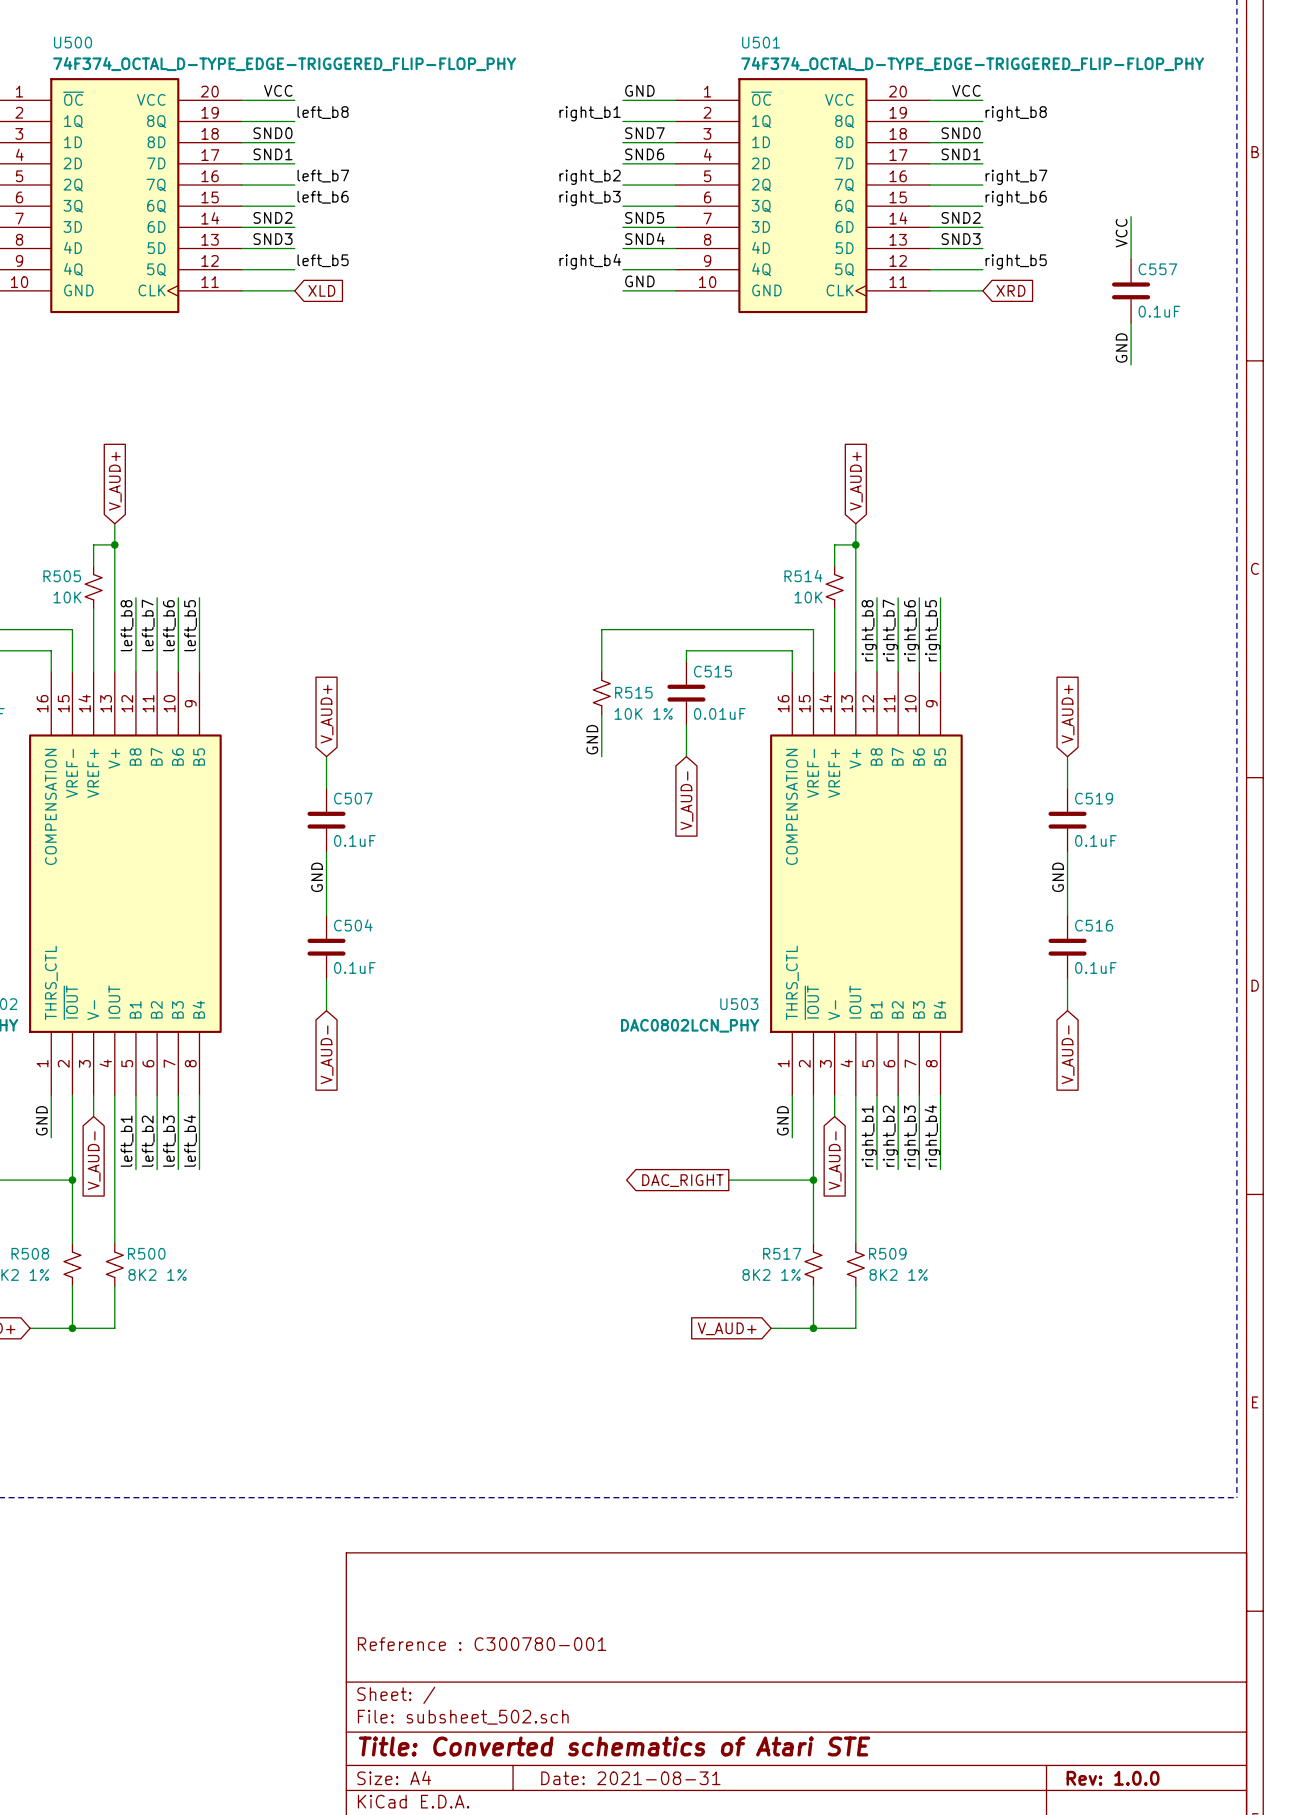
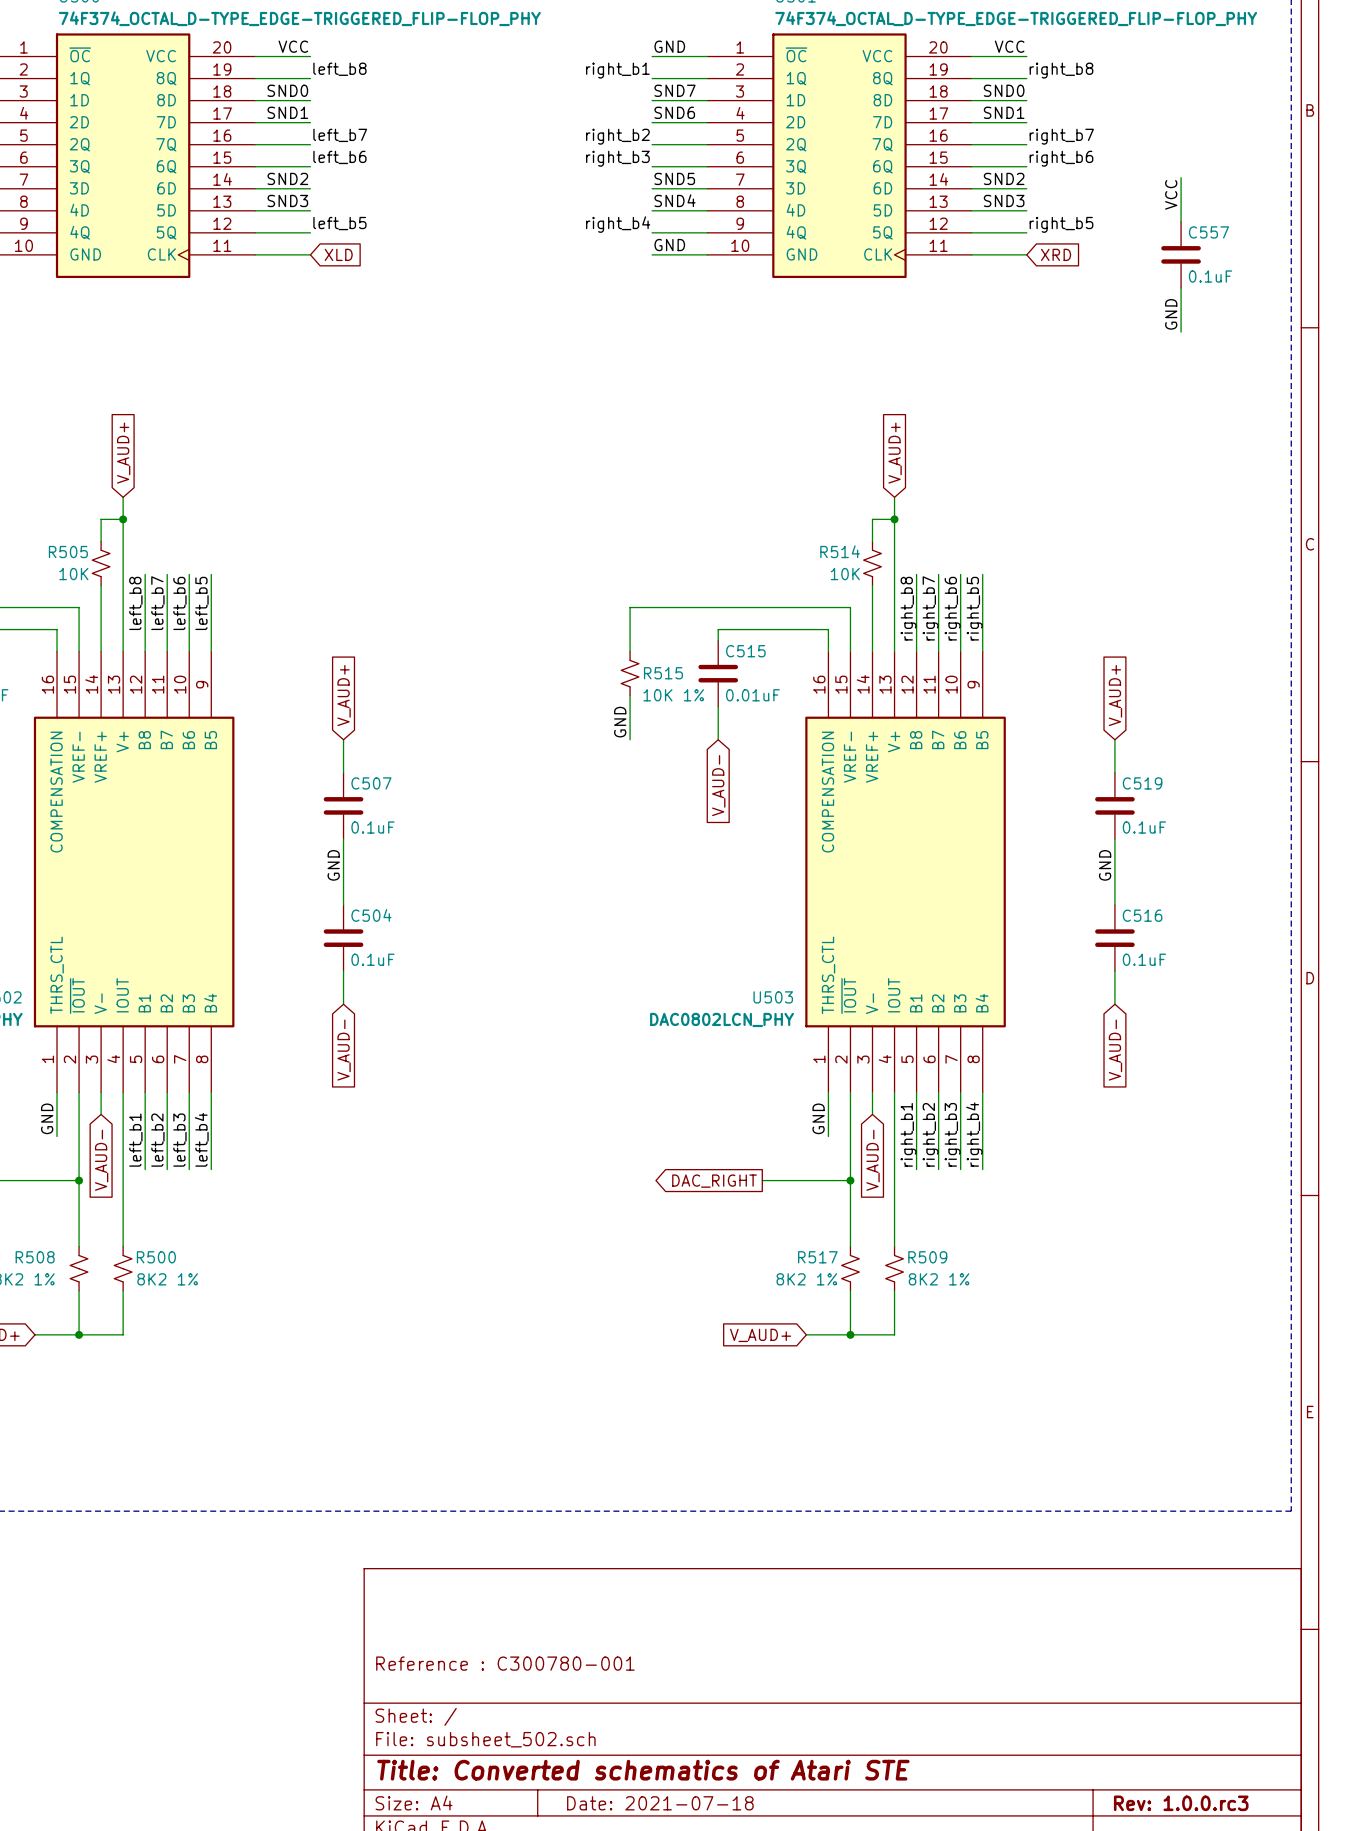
title block: Date: 2021-08-31 (630, 1778) -> Date: 2021-07-18 (660, 1803)
title block: Rev: 1.0.0 (1113, 1778) -> Rev: 1.0.0.rc3 (1181, 1803)

